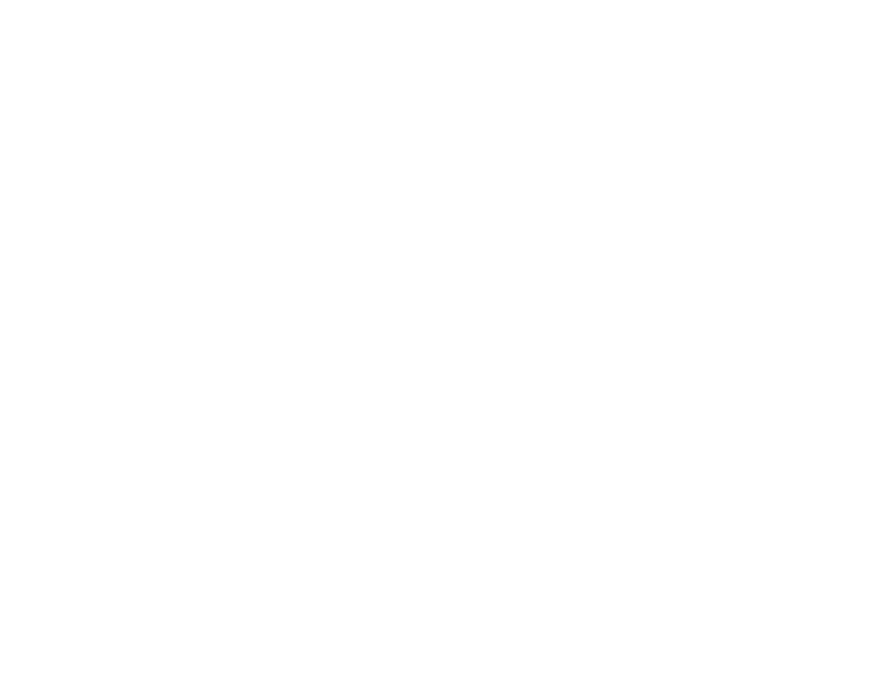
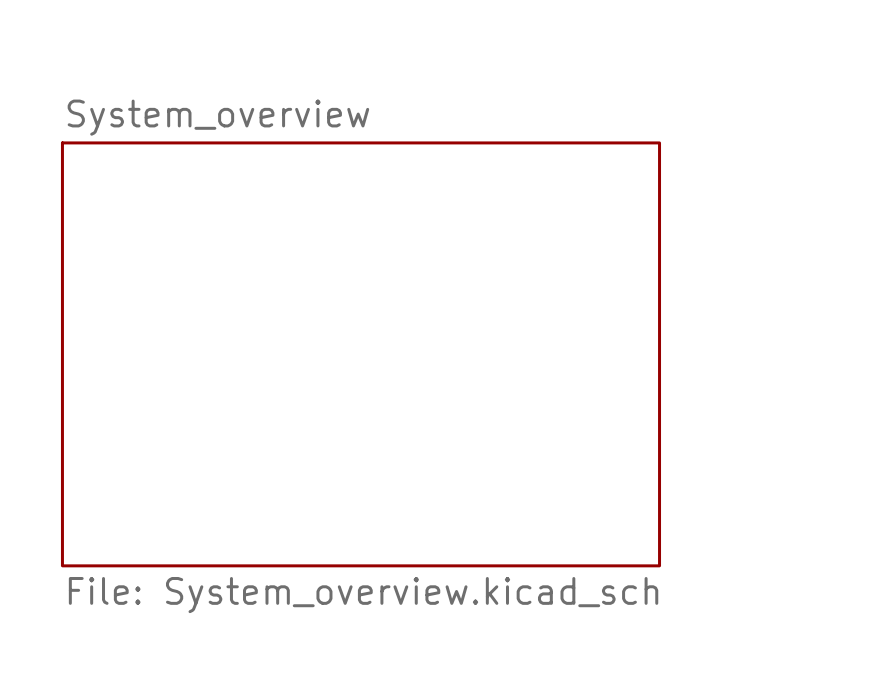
sheet System_overview: none -> File: System_overview.kicad_sch (360, 354)

